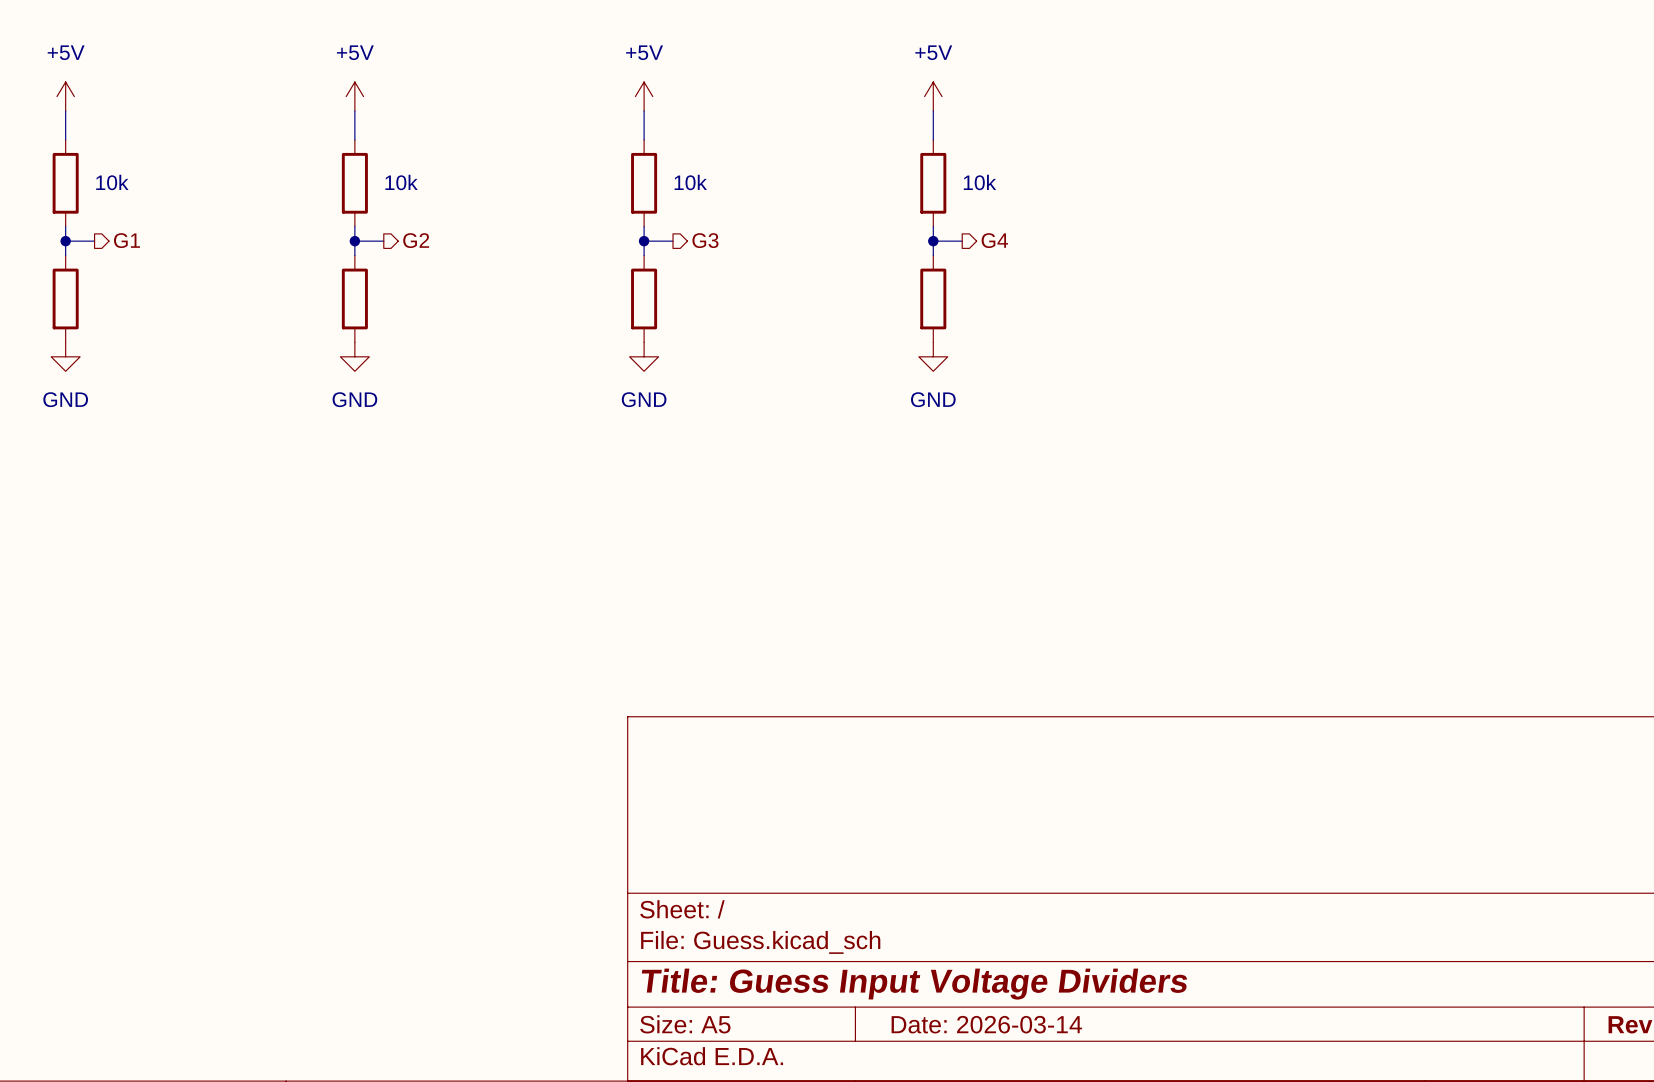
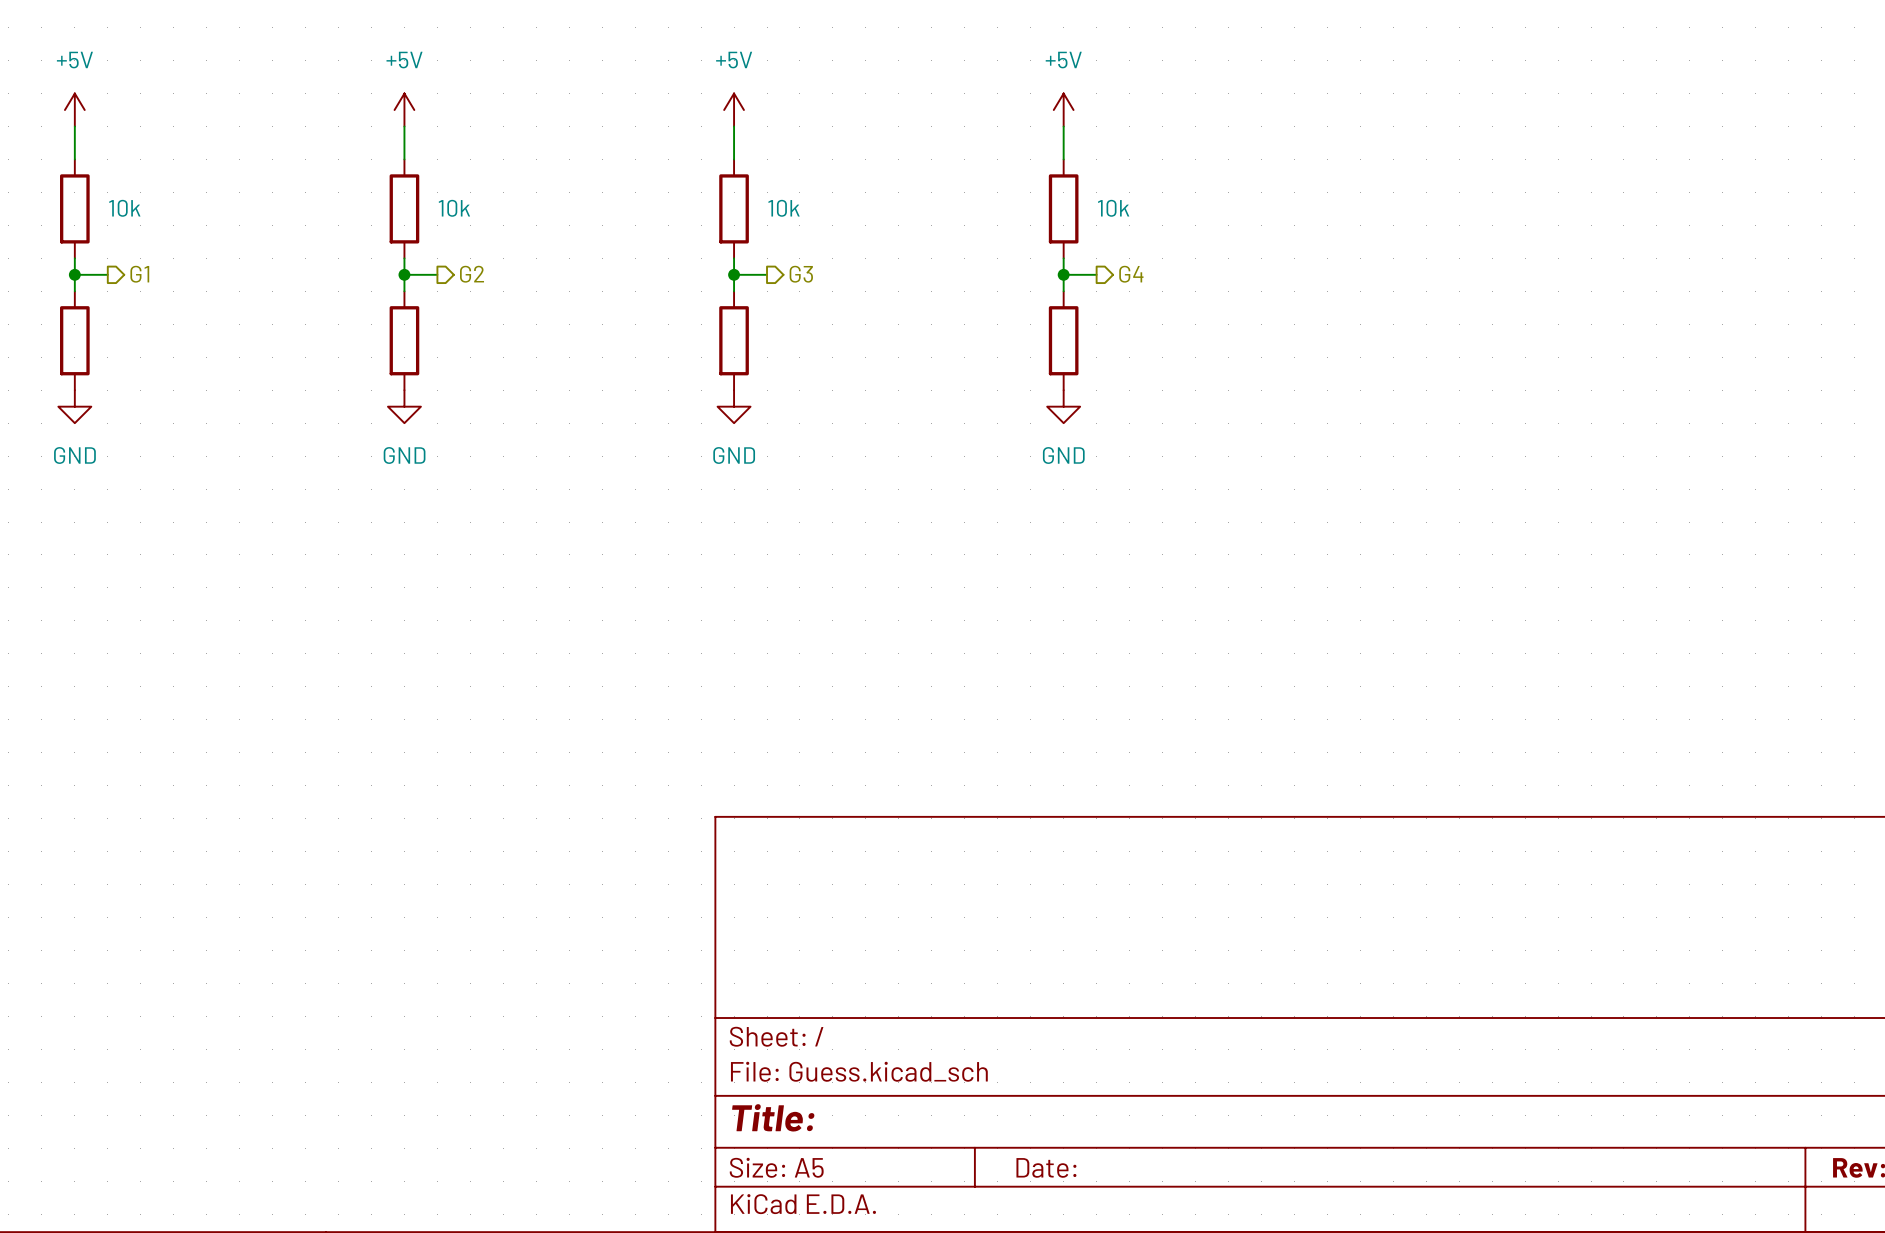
title block: Title: Guess Input Voltage Dividers (914, 984) -> Title: (773, 1117)
title block: Date: 2026-03-14 (986, 1024) -> Date: (1046, 1167)

